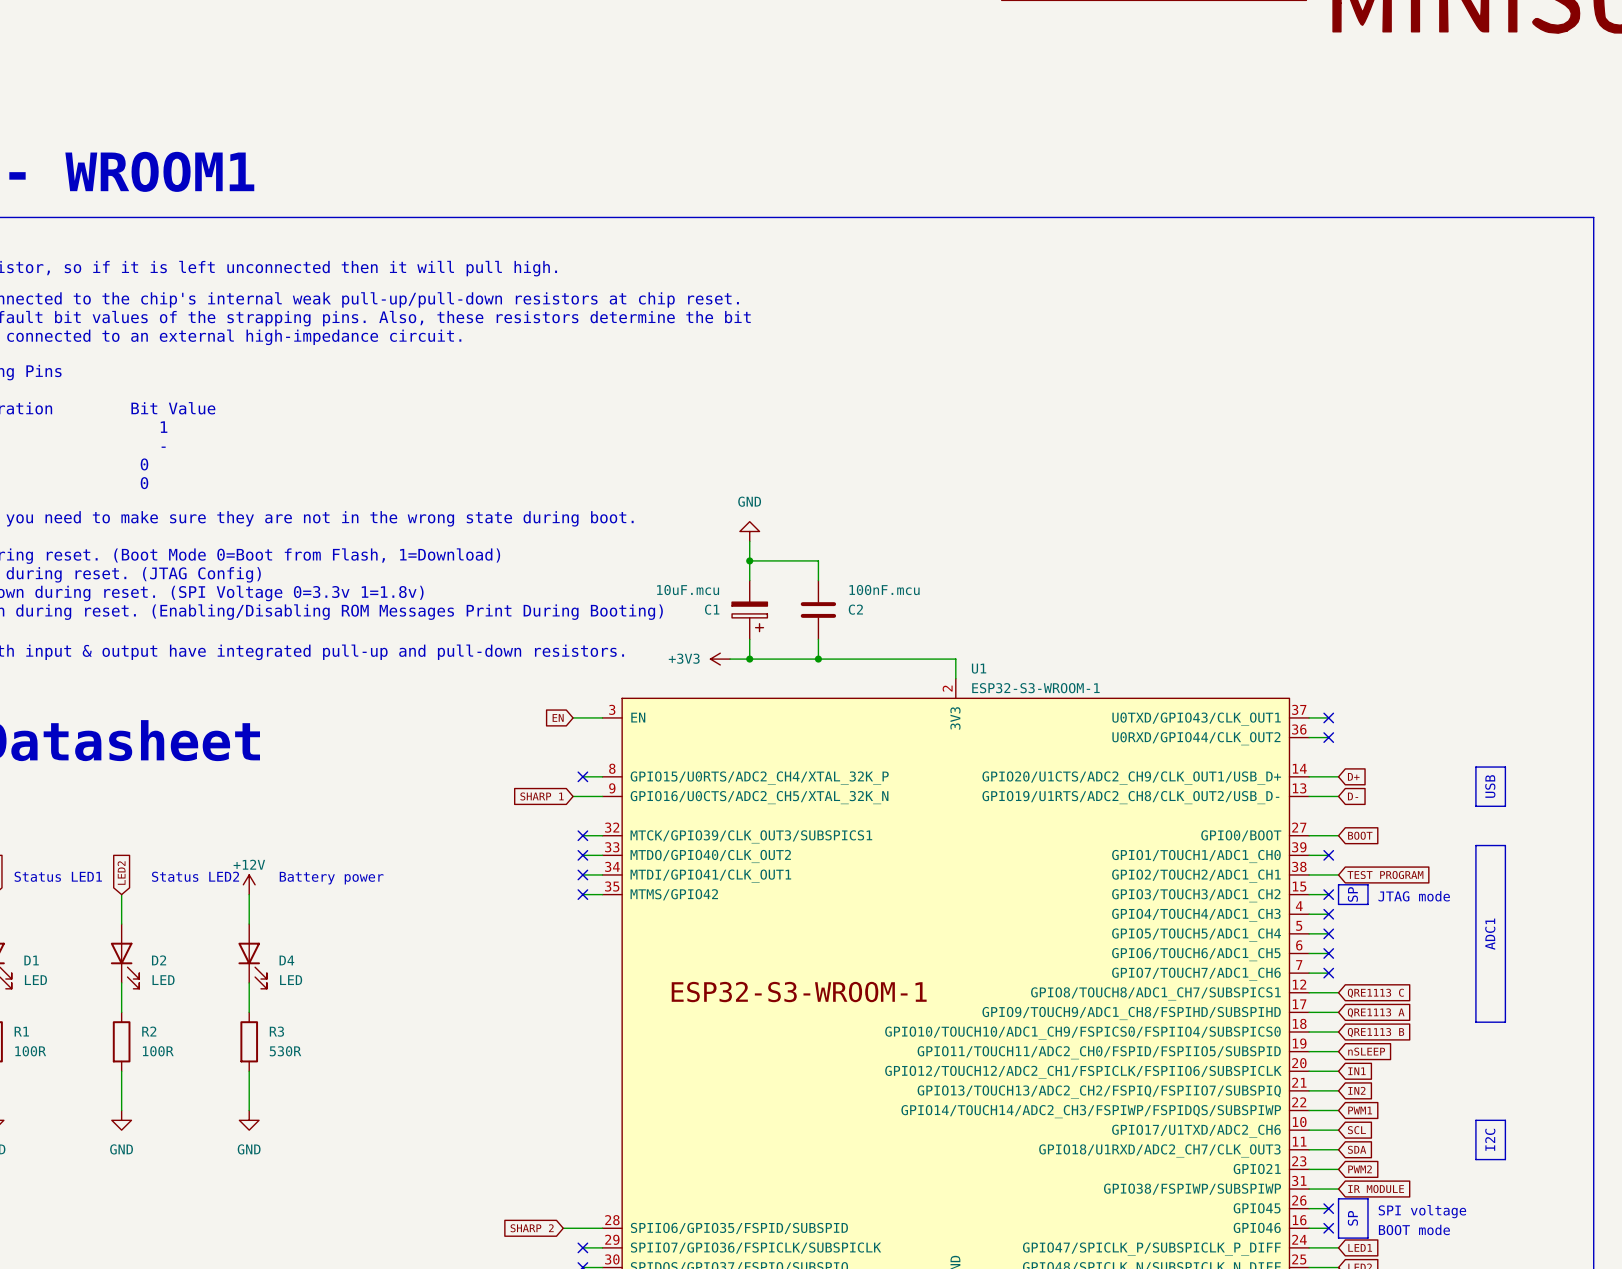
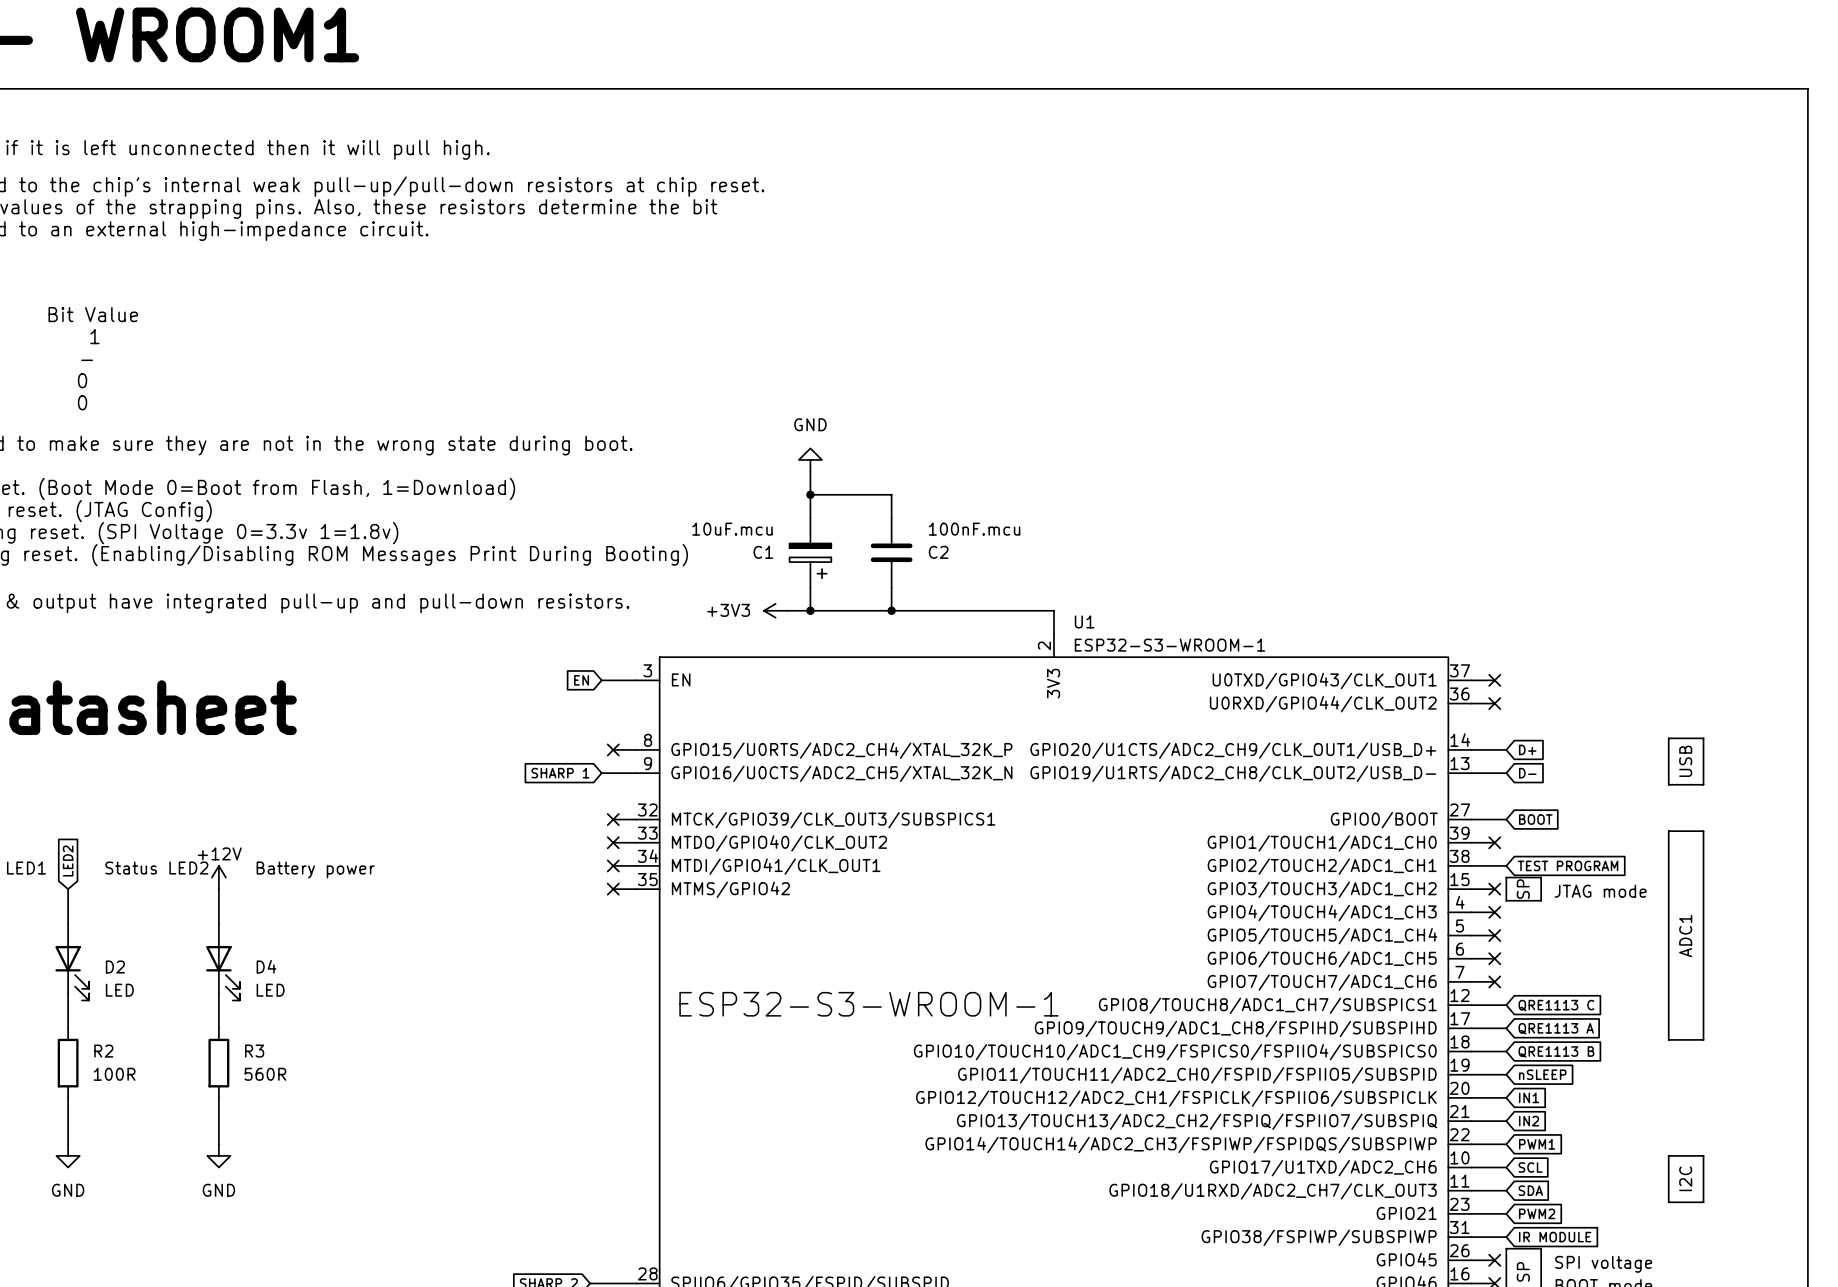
R3 value: 530R (285, 1051) -> 560R (265, 1074)

